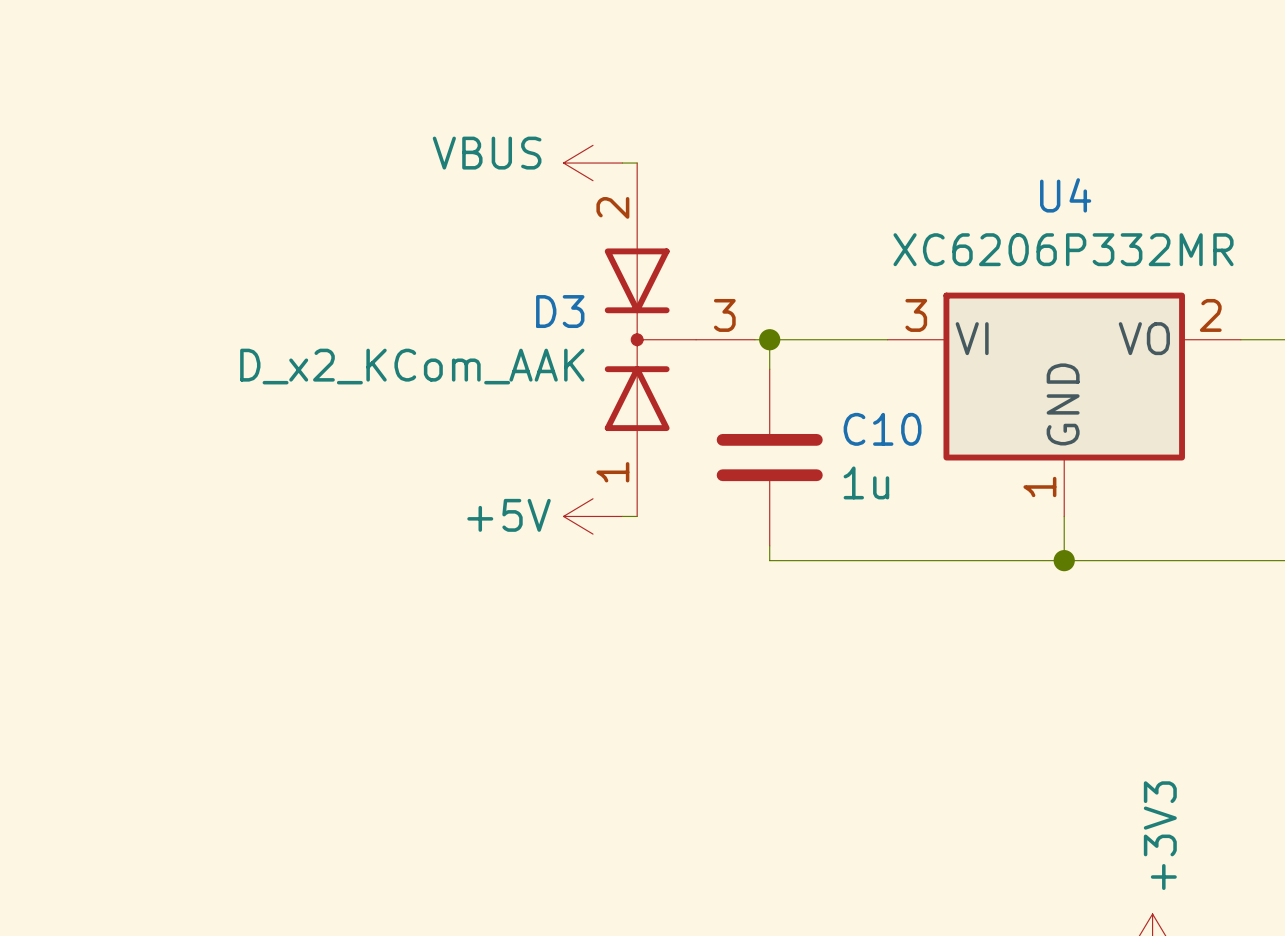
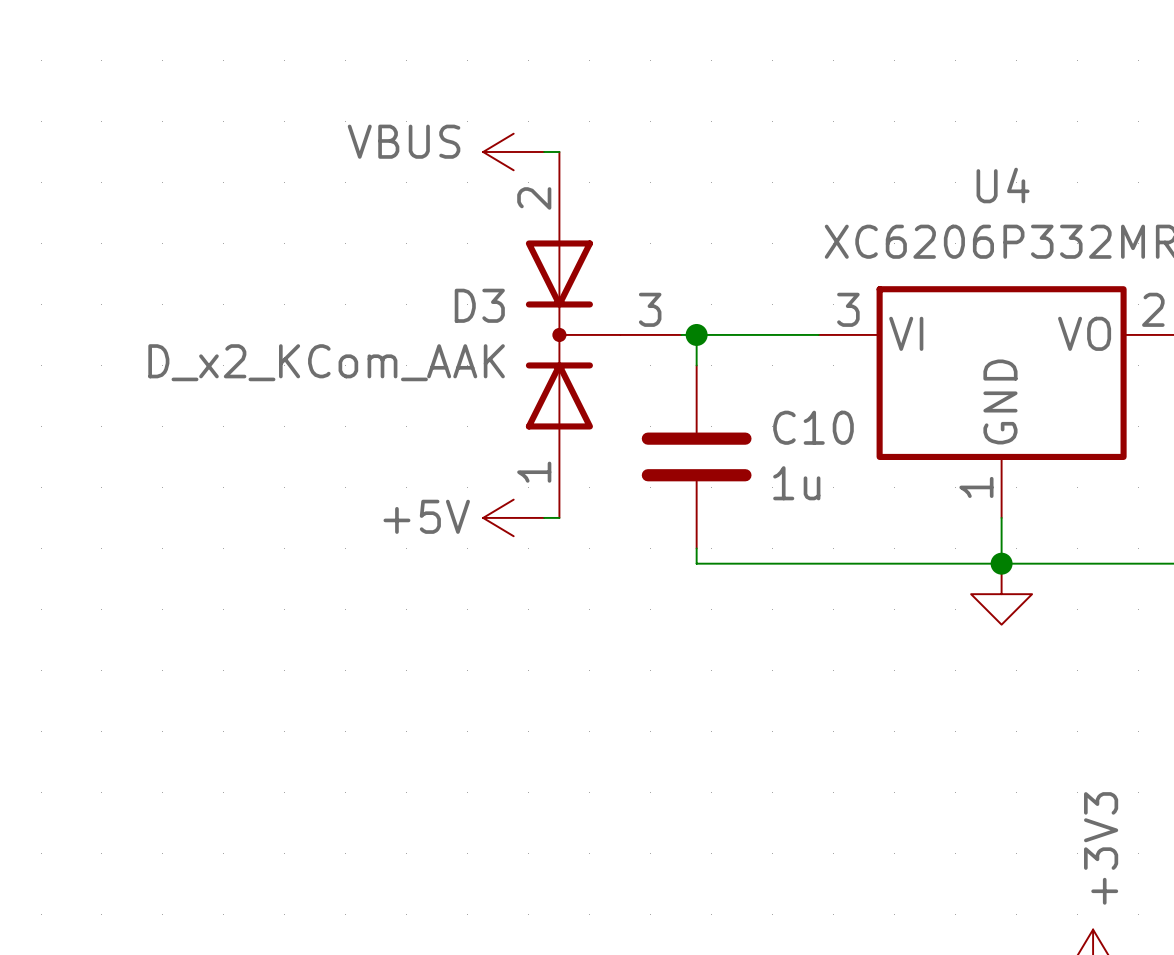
power symbol: none -> (1001, 594)

